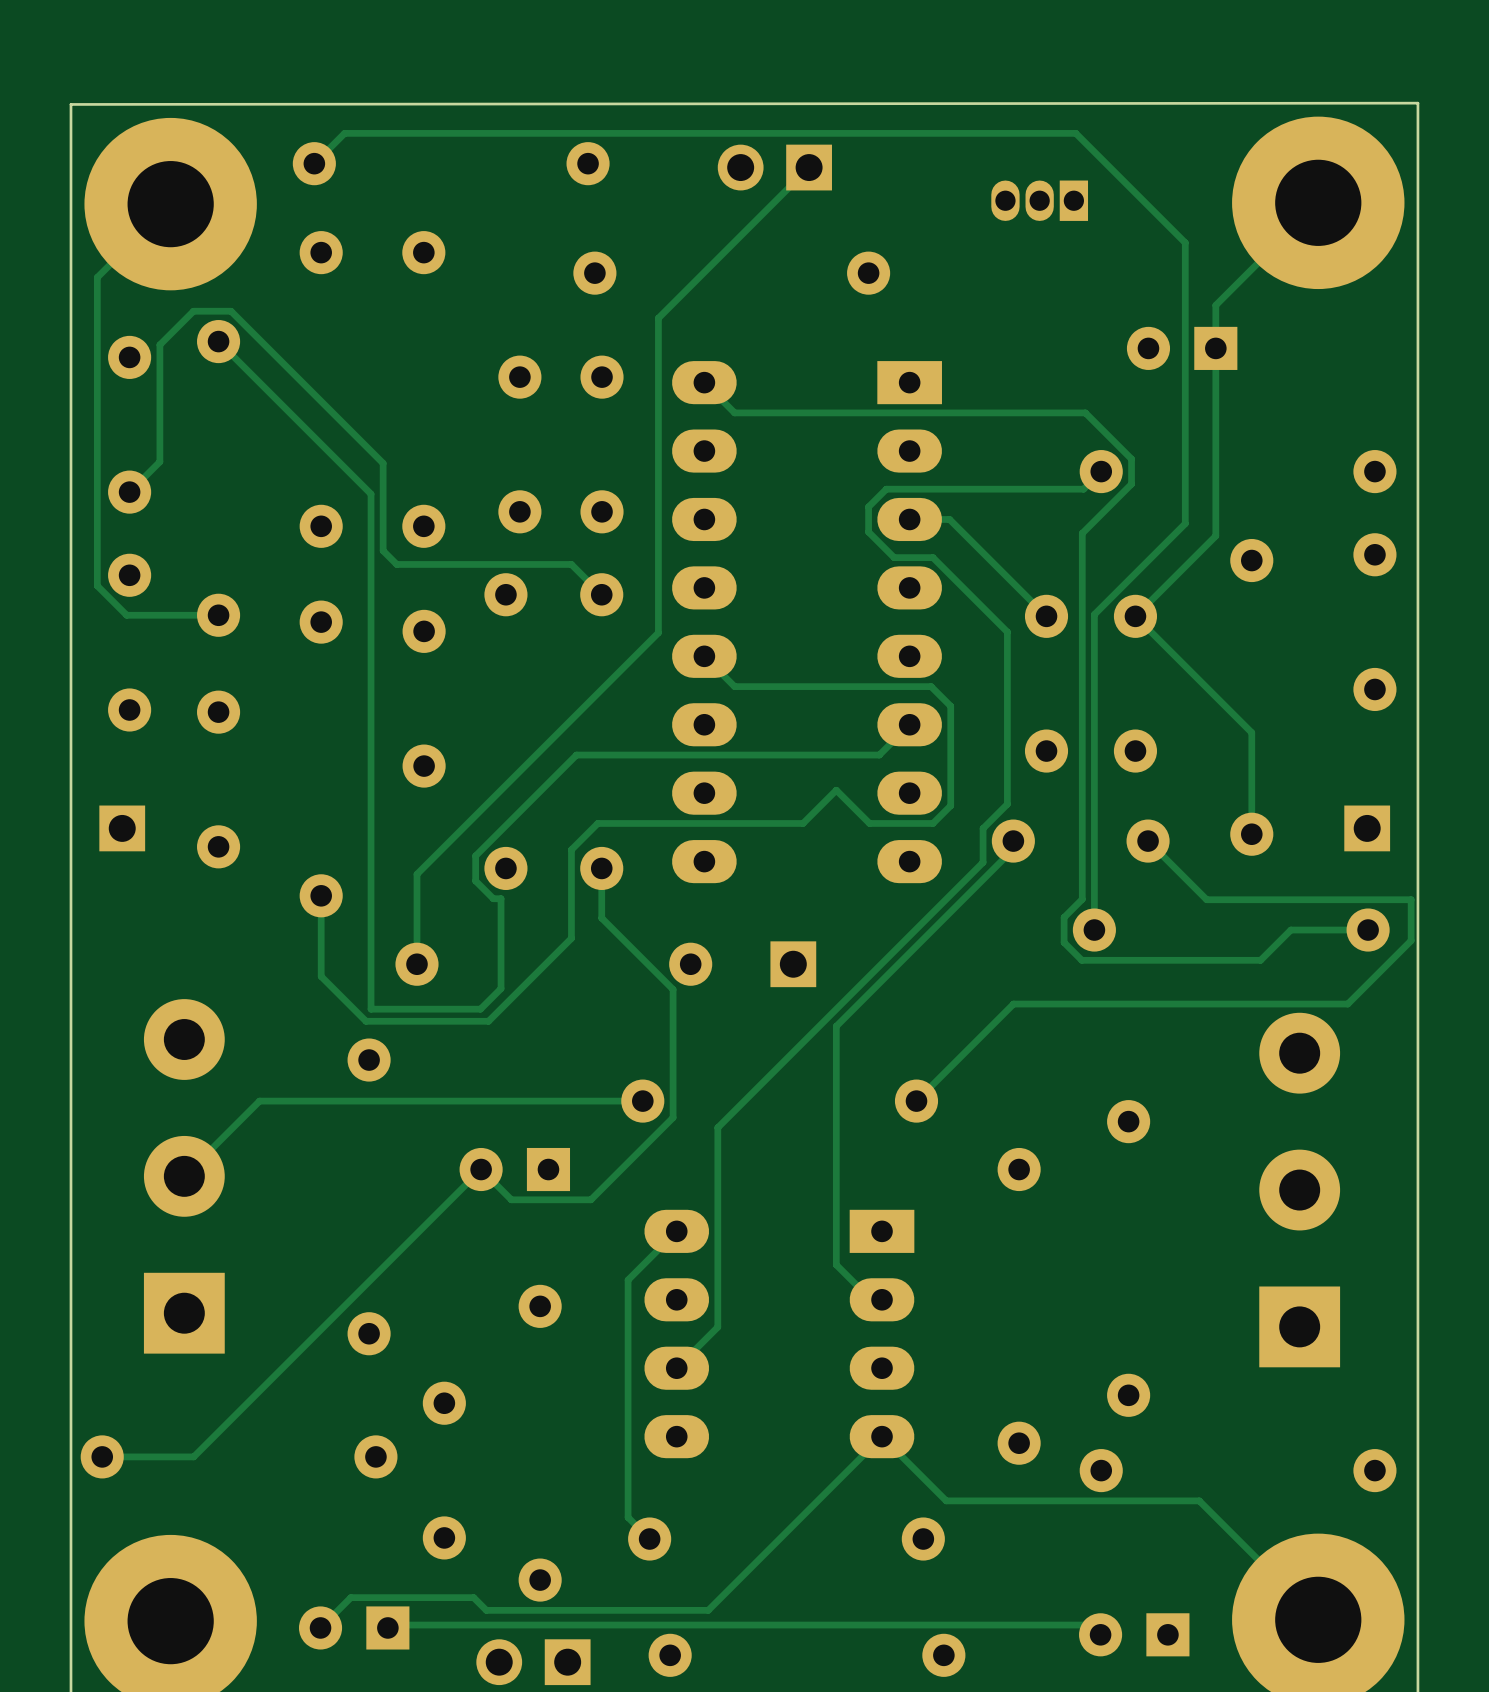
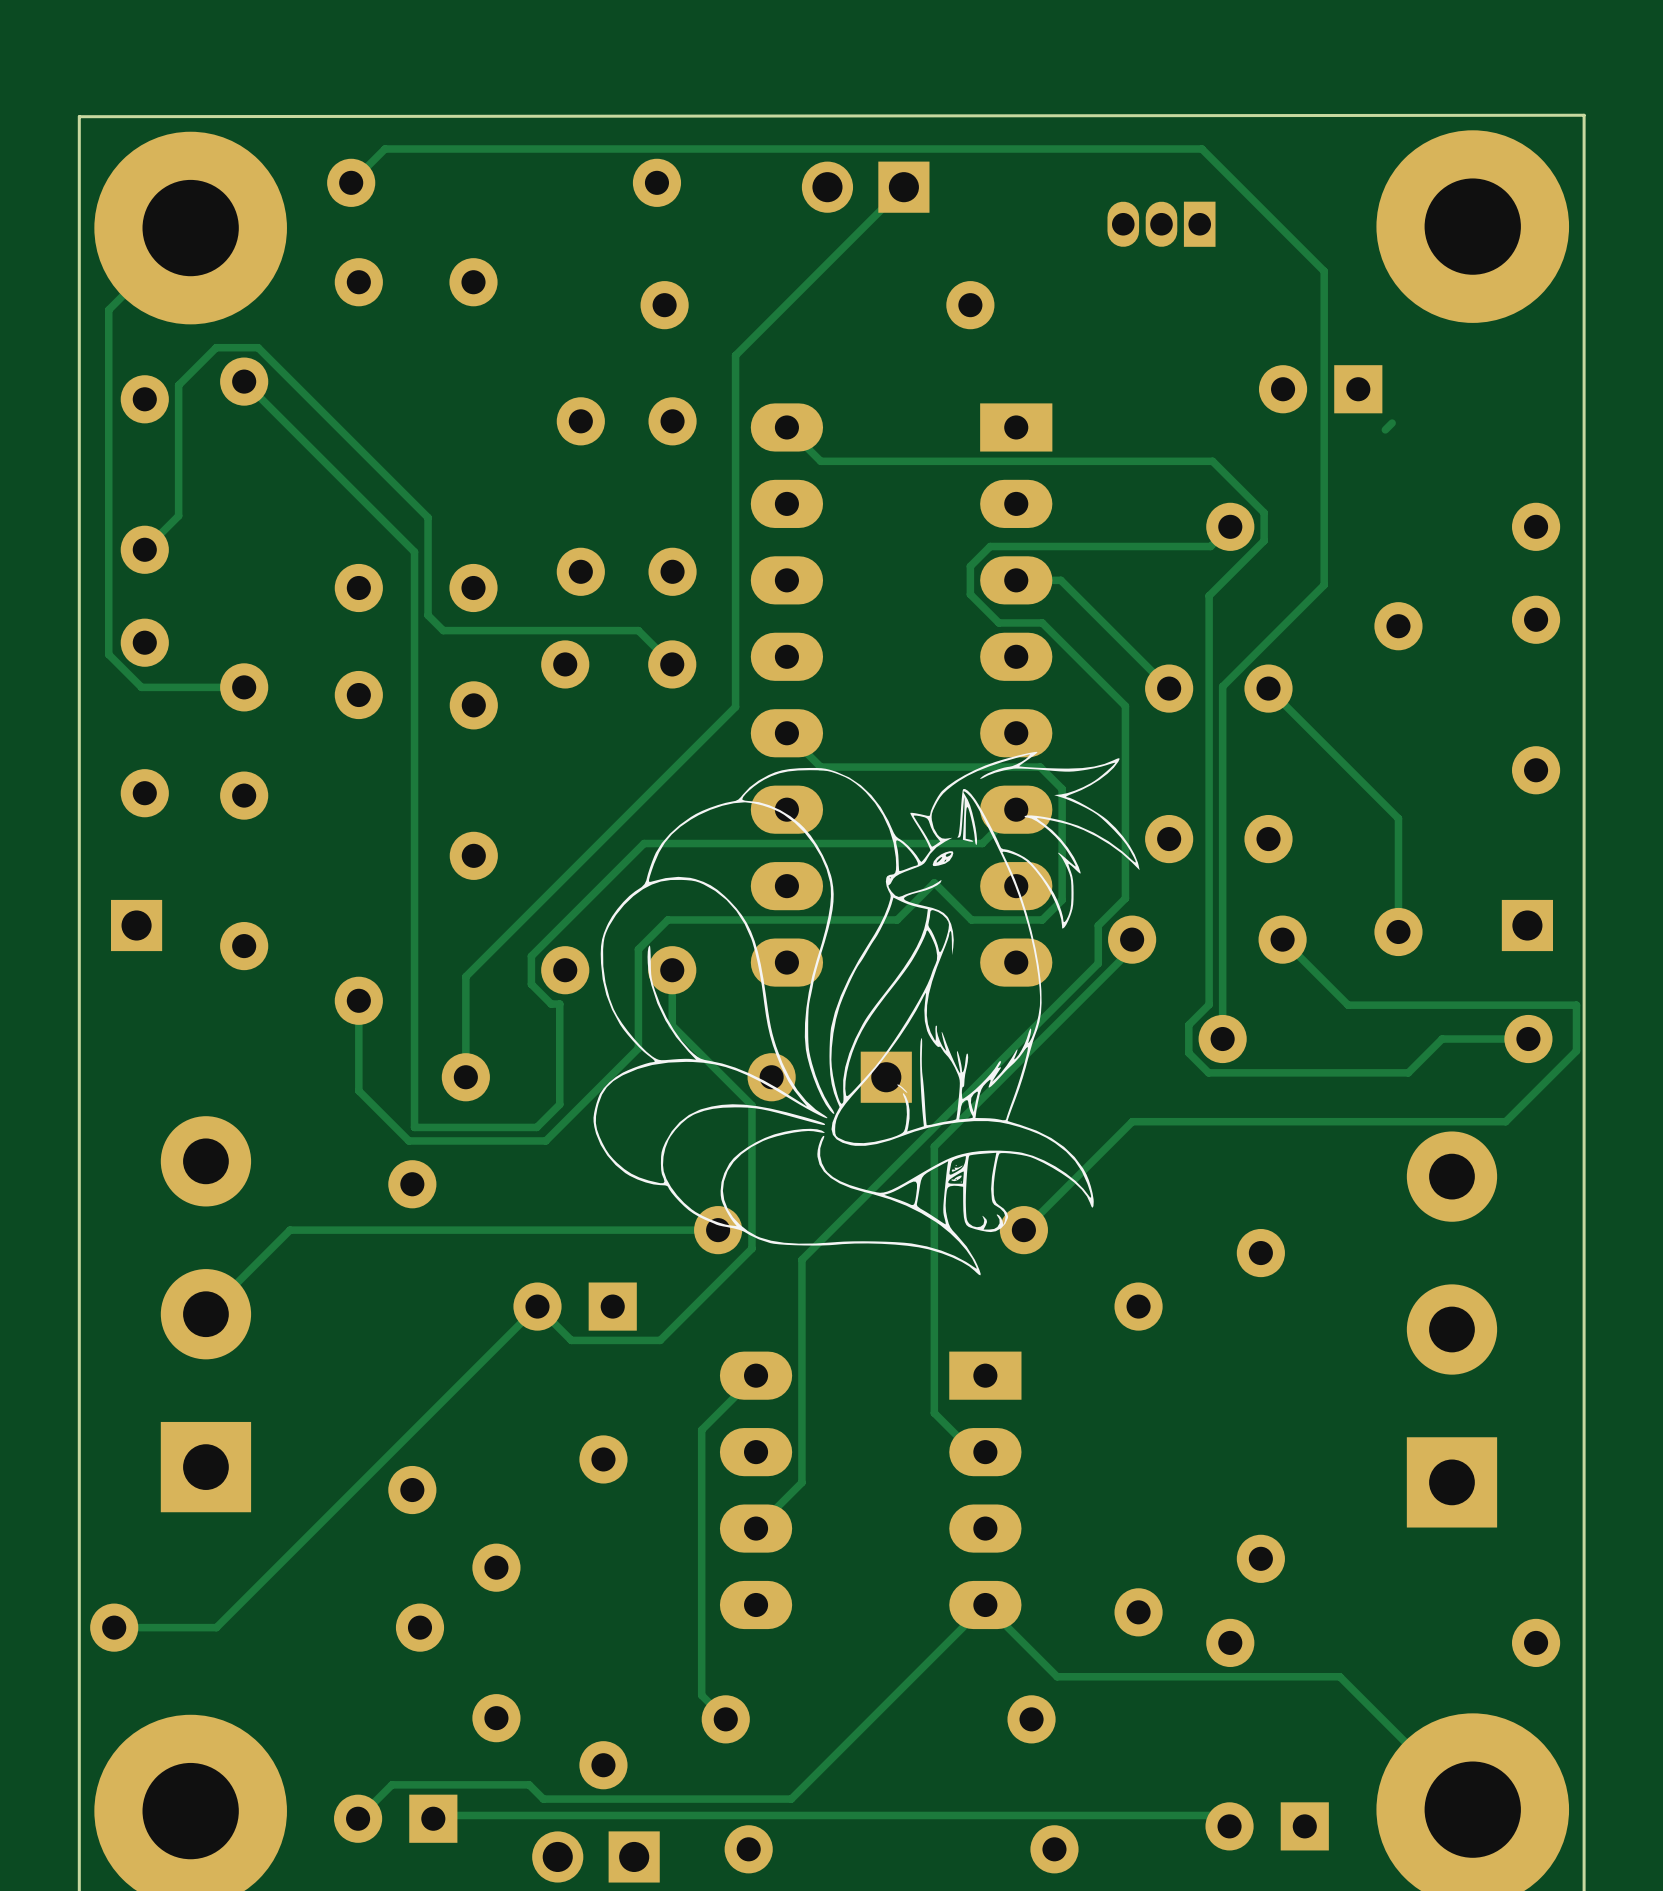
track: (1318, 202) (1215, 305) (1215, 535) (1135, 616) -> none
track: none -> (1392, 423) (1385, 429)
drawing: none -> [593, 751, 1140, 1276]

